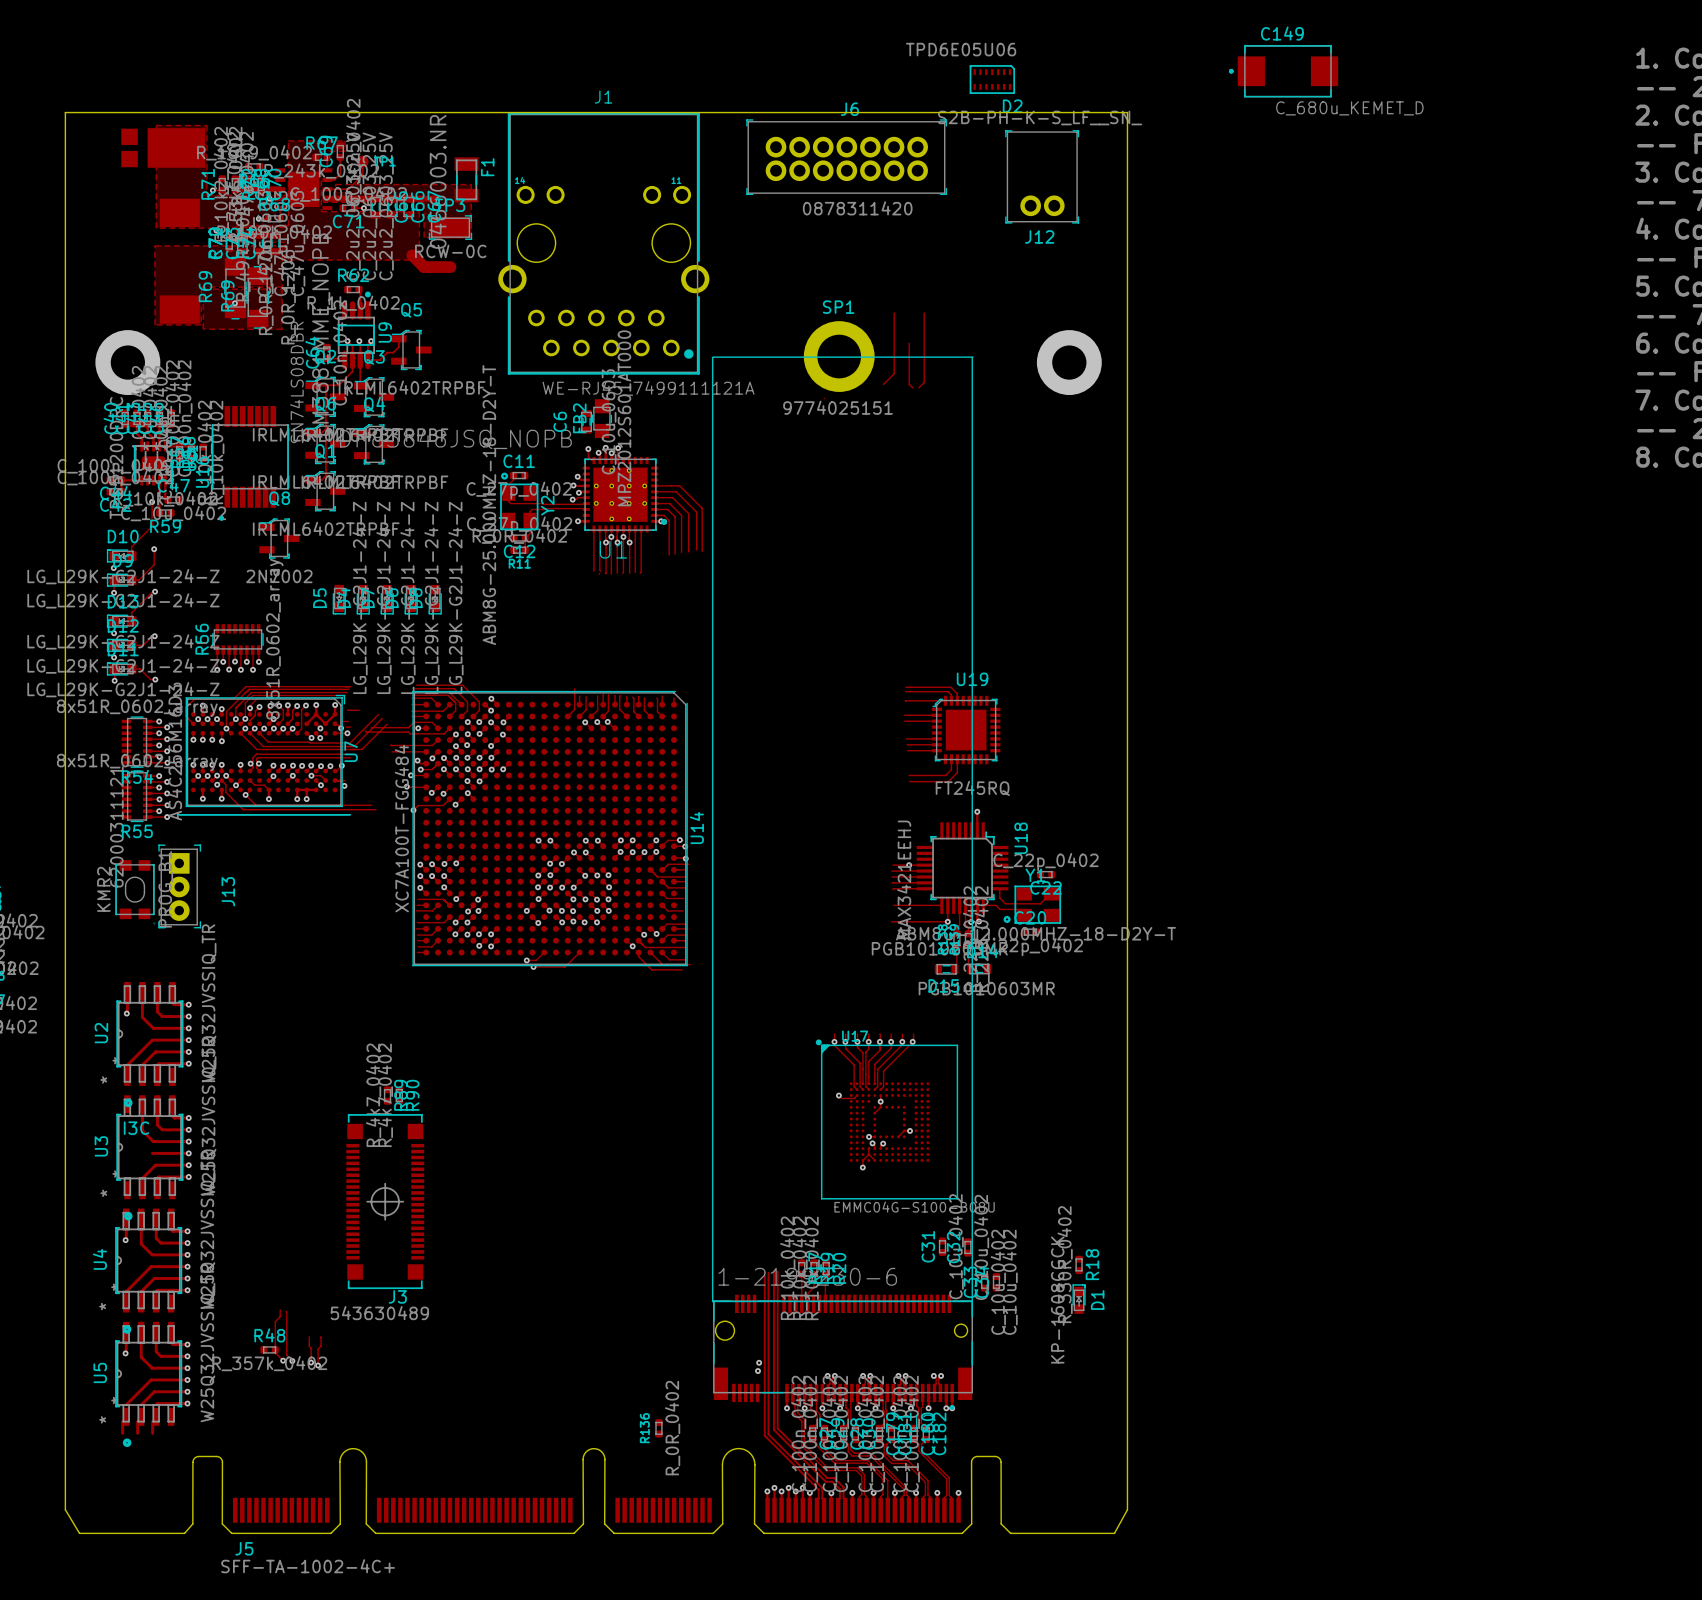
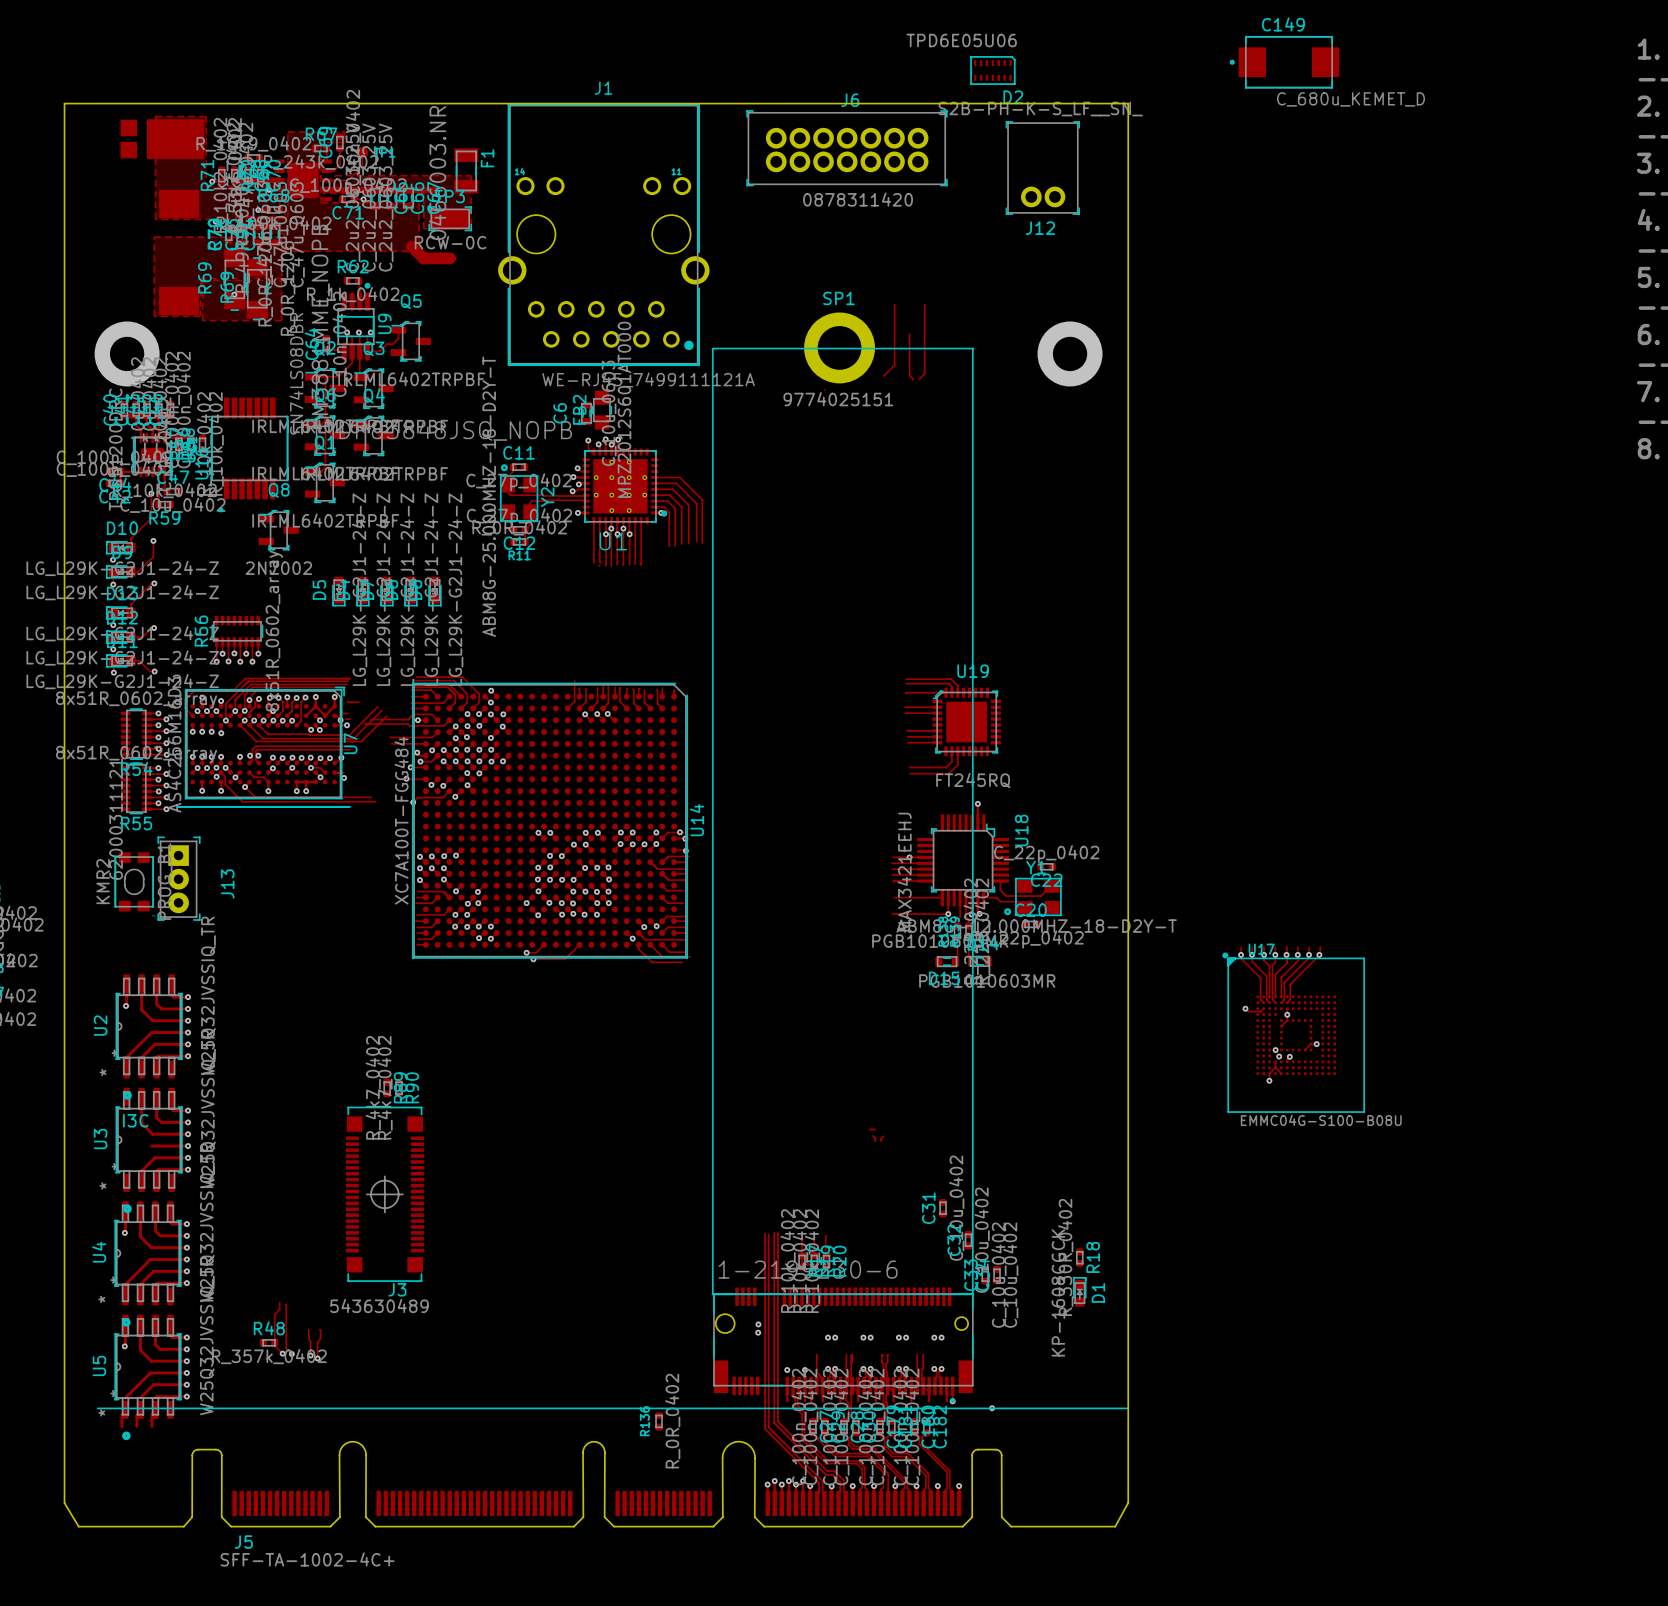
track: none -> (1241, 947) (1241, 958) (1260, 978) (1260, 999) (1263, 1002)
track: none -> (1252, 947) (1252, 961) (1266, 976) (1266, 999) (1269, 1002)
track: none -> (1263, 947) (1264, 960) (1269, 966) (1269, 996)
track: none -> (1275, 947) (1275, 962) (1272, 965) (1272, 999) (1275, 1002)
track: none -> (1286, 947) (1286, 963) (1275, 974) (1275, 996)
track: none -> (1297, 947) (1298, 956)
track: none -> (1309, 947) (1309, 957) (1284, 982) (1284, 999) (1281, 1002)
track: none -> (1320, 947) (1320, 954) (1290, 984) (1290, 999) (1287, 1002)
track: none -> (1298, 954) (1298, 960) (1281, 977) (1281, 996)
via: none -> (1241, 954)
via: none -> (1251, 954)
via: none -> (1264, 954)
via: none -> (1275, 954)
via: none -> (1286, 954)
via: none -> (1297, 954)
via: none -> (1309, 954)
via: none -> (1319, 954)
via: none -> (1245, 1008)
track: none -> (1263, 1008) (1260, 1011) (1248, 1011) (1245, 1008)
track: none -> (1287, 1008) (1287, 1020) (1281, 1026)
via: none -> (1287, 1014)
track: (834, 1034) (834, 1045) (854, 1065) (854, 1086) (857, 1089) -> none
track: (845, 1034) (845, 1048) (860, 1063) (860, 1086) (862, 1089) -> none
track: (857, 1034) (857, 1047) (862, 1052) (862, 1083) -> none
track: (868, 1034) (868, 1049) (865, 1052) (865, 1086) (868, 1089) -> none
track: (879, 1034) (880, 1050) (868, 1061) (868, 1083) -> none
track: (891, 1034) (891, 1043) -> none
track: (902, 1034) (902, 1044) (877, 1069) (877, 1086) (874, 1089) -> none
track: (913, 1034) (913, 1041) (883, 1071) (883, 1086) (880, 1089) -> none
via: (834, 1041) -> none
via: (845, 1041) -> none
via: (857, 1041) -> none
via: (868, 1041) -> none
via: (879, 1041) -> none
track: (891, 1041) (891, 1047) (874, 1064) (874, 1083) -> none
via: (891, 1041) -> none
via: (902, 1041) -> none
via: (912, 1041) -> none
track: none -> (1316, 1044) (1310, 1044) (1305, 1049)
via: none -> (1316, 1044)
via: none -> (1275, 1050)
via: none -> (1279, 1056)
track: none -> (1289, 1056) (1287, 1061)
via: none -> (1289, 1056)
track: none -> (1275, 1061) (1275, 1067)
track: none -> (1275, 1067) (1269, 1073) (1269, 1080)
track: none -> (1275, 1067) (1281, 1073)
via: none -> (1269, 1080)
via: (838, 1095) -> none
track: (857, 1095) (854, 1098) (841, 1098) (838, 1095) -> none
track: (880, 1095) (880, 1107) (874, 1113) -> none
via: (880, 1101) -> none
U17 position: (886, 1119) -> (1293, 1032)
track: (909, 1130) (904, 1130) (898, 1136) -> none
via: (910, 1130) -> none
via: (869, 1136) -> none
via: (872, 1143) -> none
via: (883, 1143) -> none
track: (868, 1148) (868, 1154) -> none
track: (868, 1154) (862, 1160) (862, 1167) -> none
track: (868, 1154) (874, 1160) -> none
via: (862, 1167) -> none
track: none -> (774, 1232) (774, 1264)
track: none -> (777, 1232) (777, 1264)
track: none -> (765, 1233) (765, 1265)
track: none -> (768, 1234) (768, 1265)
C31 position: (942, 1246) -> (943, 1208)
track: (801, 1274) (801, 1303) -> (802, 1235) (802, 1265)
track: (814, 1274) (814, 1287) (807, 1293) (807, 1303) -> (814, 1235) (814, 1248) (807, 1255) (807, 1265)
track: (826, 1274) (825, 1303) -> (826, 1235) (825, 1265)
via: none -> (758, 1324)
via: none -> (758, 1332)
via: none -> (827, 1337)
via: none -> (835, 1337)
via: none -> (863, 1337)
via: none -> (870, 1337)
via: none -> (898, 1337)
via: none -> (906, 1337)
via: none -> (934, 1337)
via: none -> (941, 1337)
track: none -> (846, 1354) (848, 1385) (843, 1389)
via: (759, 1362) -> none
track: none -> (883, 1355) (881, 1354) (884, 1385) (879, 1389)
track: none -> (886, 1355) (887, 1354) (887, 1385) (891, 1389)
track: none -> (851, 1363) (852, 1362) (852, 1354) (851, 1355) (851, 1385) (855, 1389)
via: (757, 1371) -> none
via: none -> (787, 1370)
via: none -> (804, 1370)
track: (816, 1392) (816, 1410) (819, 1416) -> (816, 1354) (816, 1372) (820, 1377)
track: (916, 1392) (918, 1423) (914, 1428) -> (917, 1354) (919, 1385) (914, 1389)
track: (922, 1392) (921, 1423) (926, 1428) -> (923, 1354) (921, 1384) (926, 1389)
via: (787, 1408) -> none
via: (804, 1408) -> none
via: (822, 1408) -> none
via: (840, 1408) -> none
via: (857, 1408) -> none
via: (875, 1408) -> none
via: (893, 1408) -> none
via: (910, 1408) -> none
via: (928, 1408) -> none
via: (946, 1408) -> none
line: none -> (97, 1408) (1127, 1408)
via: none -> (992, 1408)

